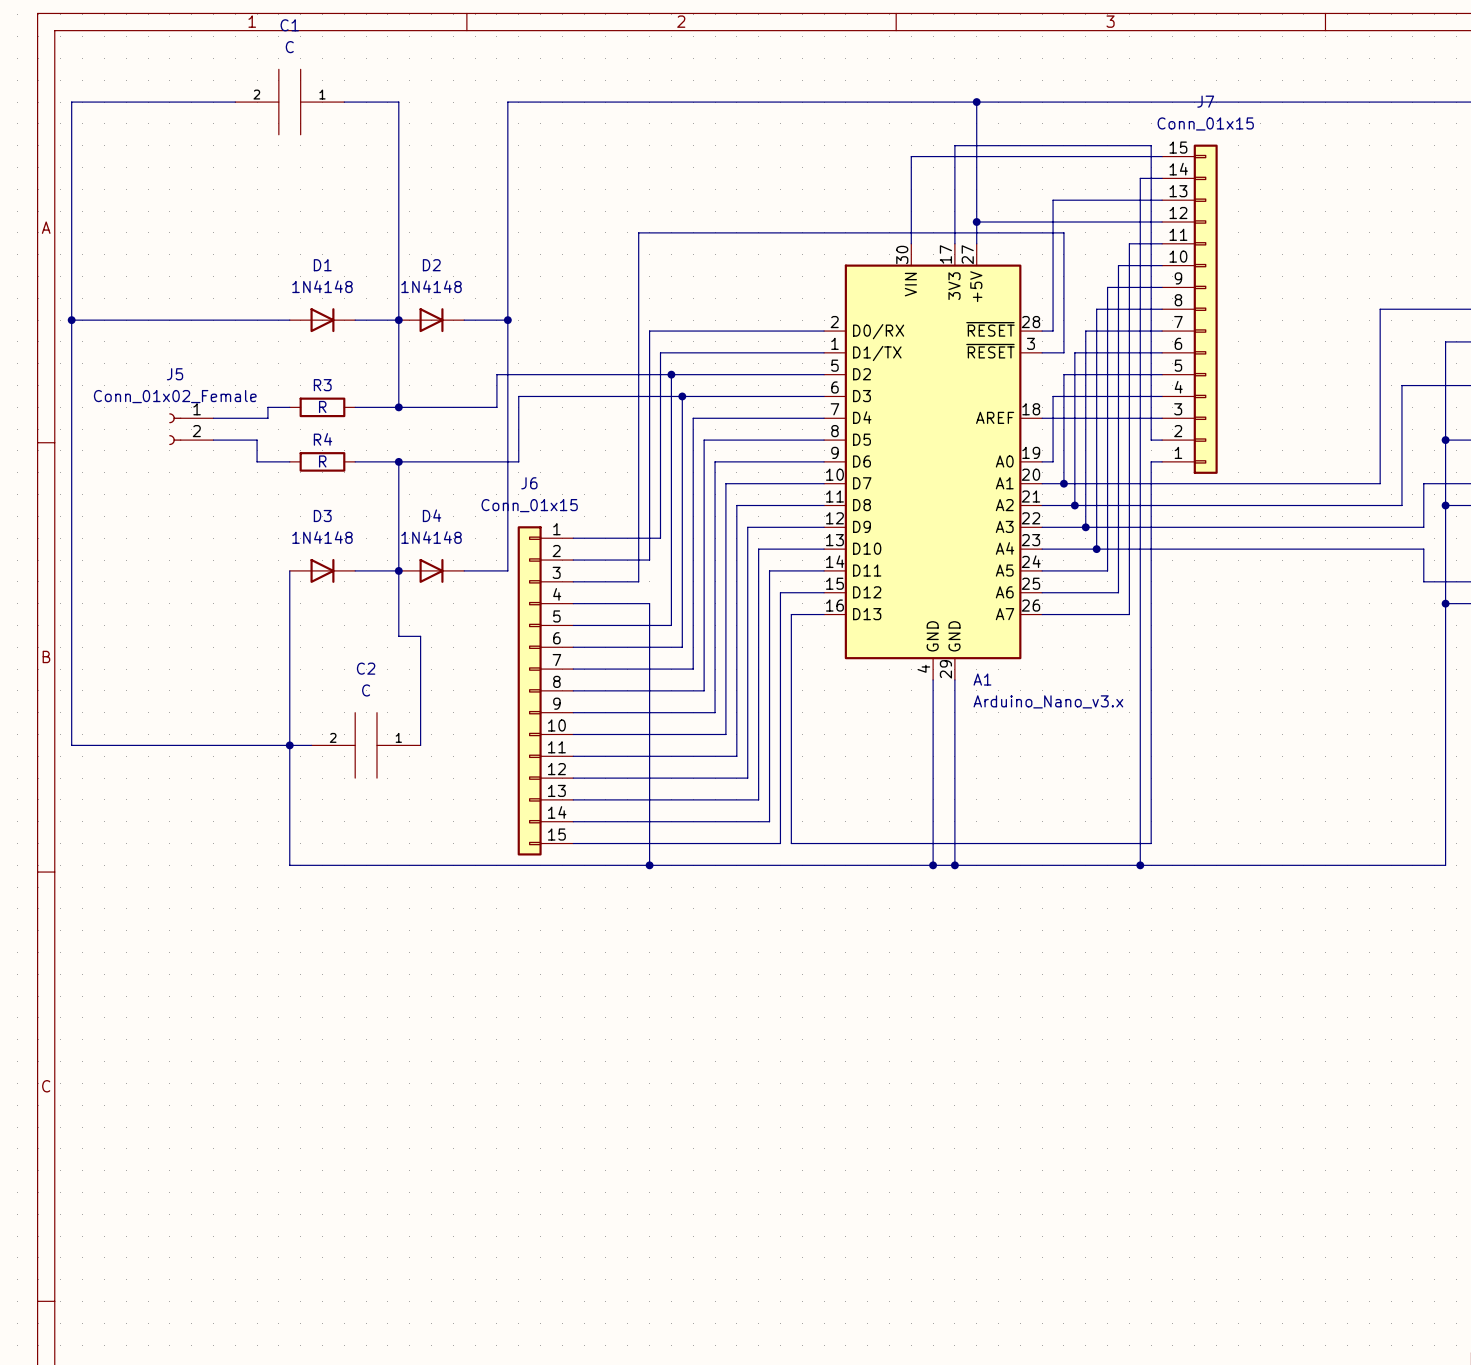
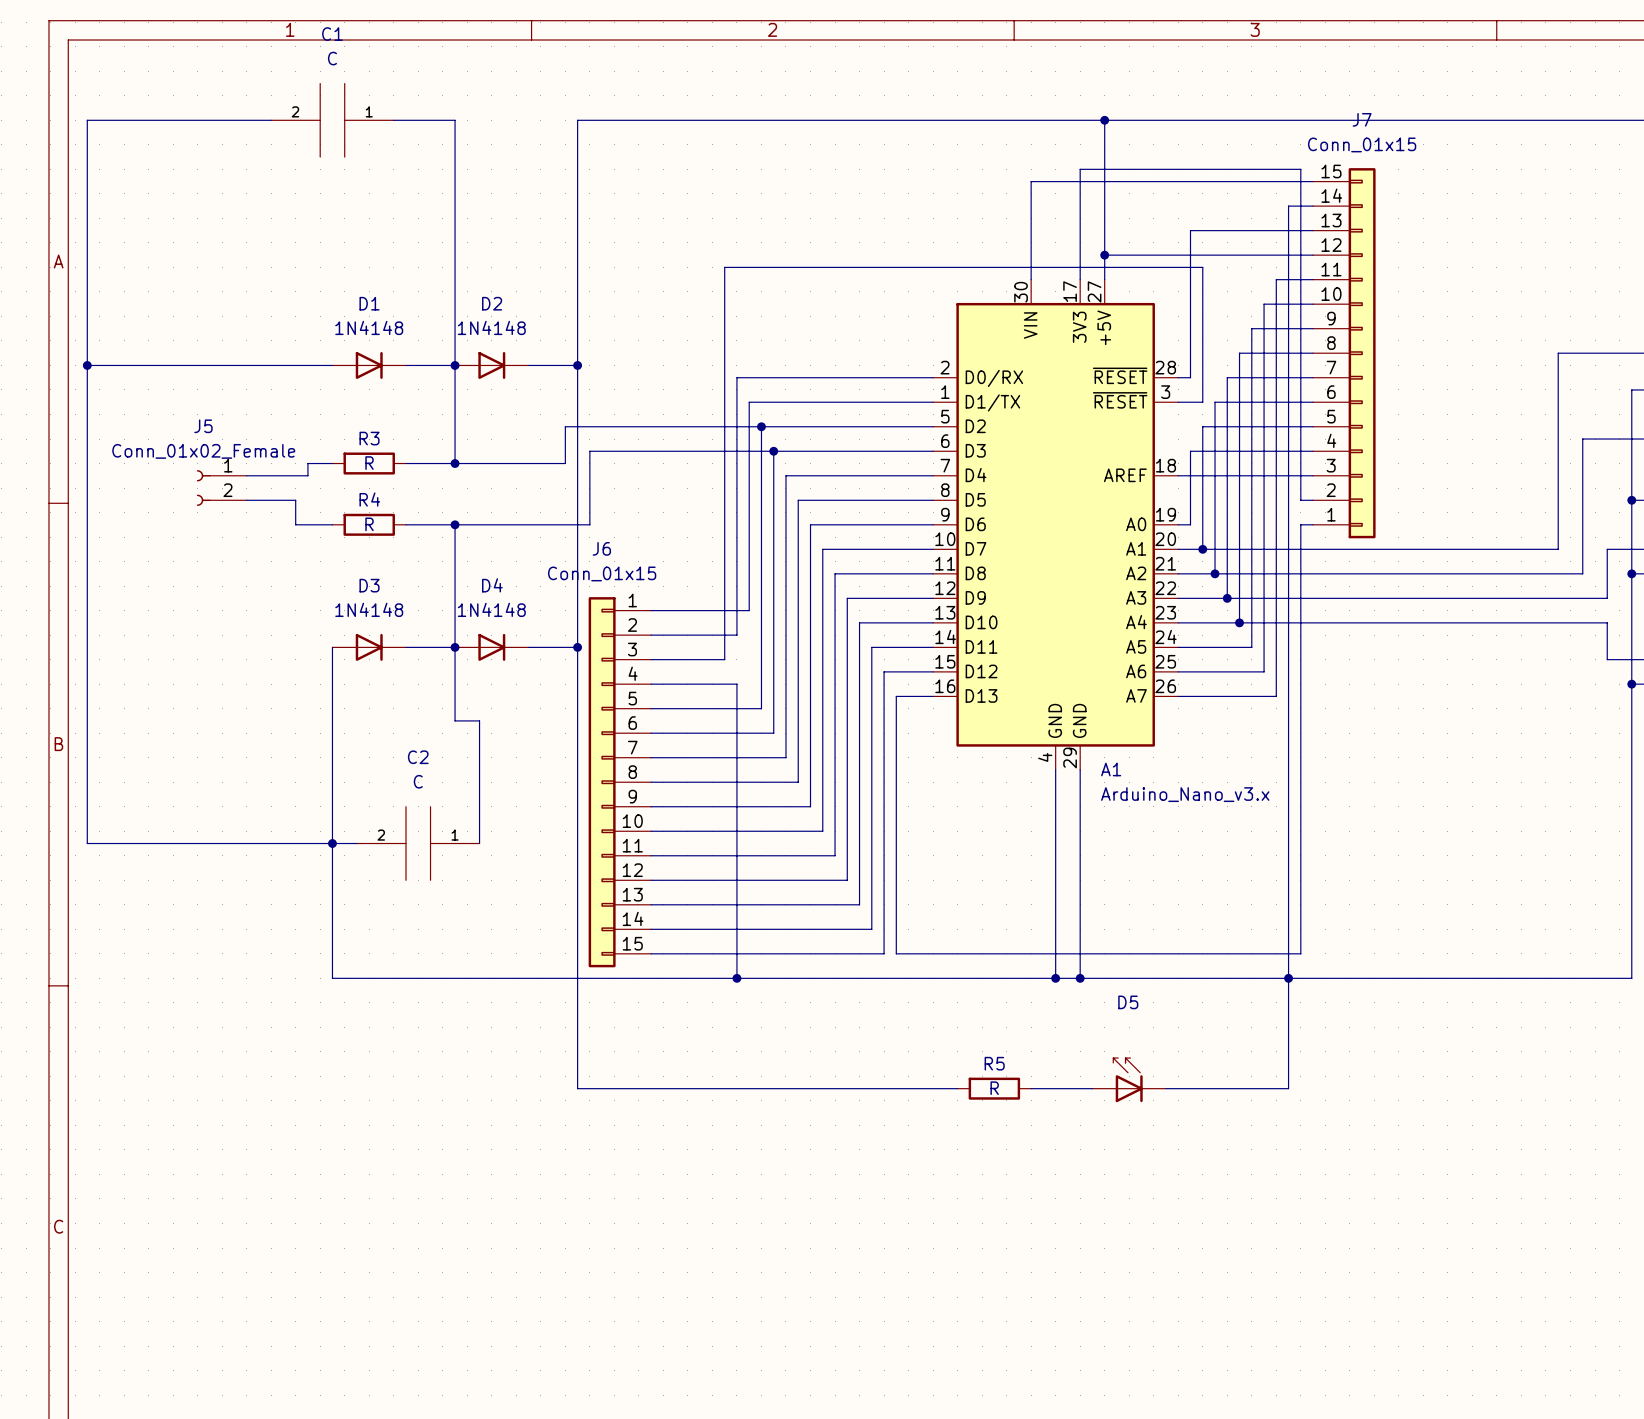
wire: none -> (577, 647) (577, 1088) (957, 1088)
junction: none -> (577, 647)
wire: none -> (1288, 978) (1288, 1088) (1165, 1088)
D5: none -> (1129, 1080)
R5: none -> R (994, 1088)
wire: none -> (1031, 1088) (1092, 1088)

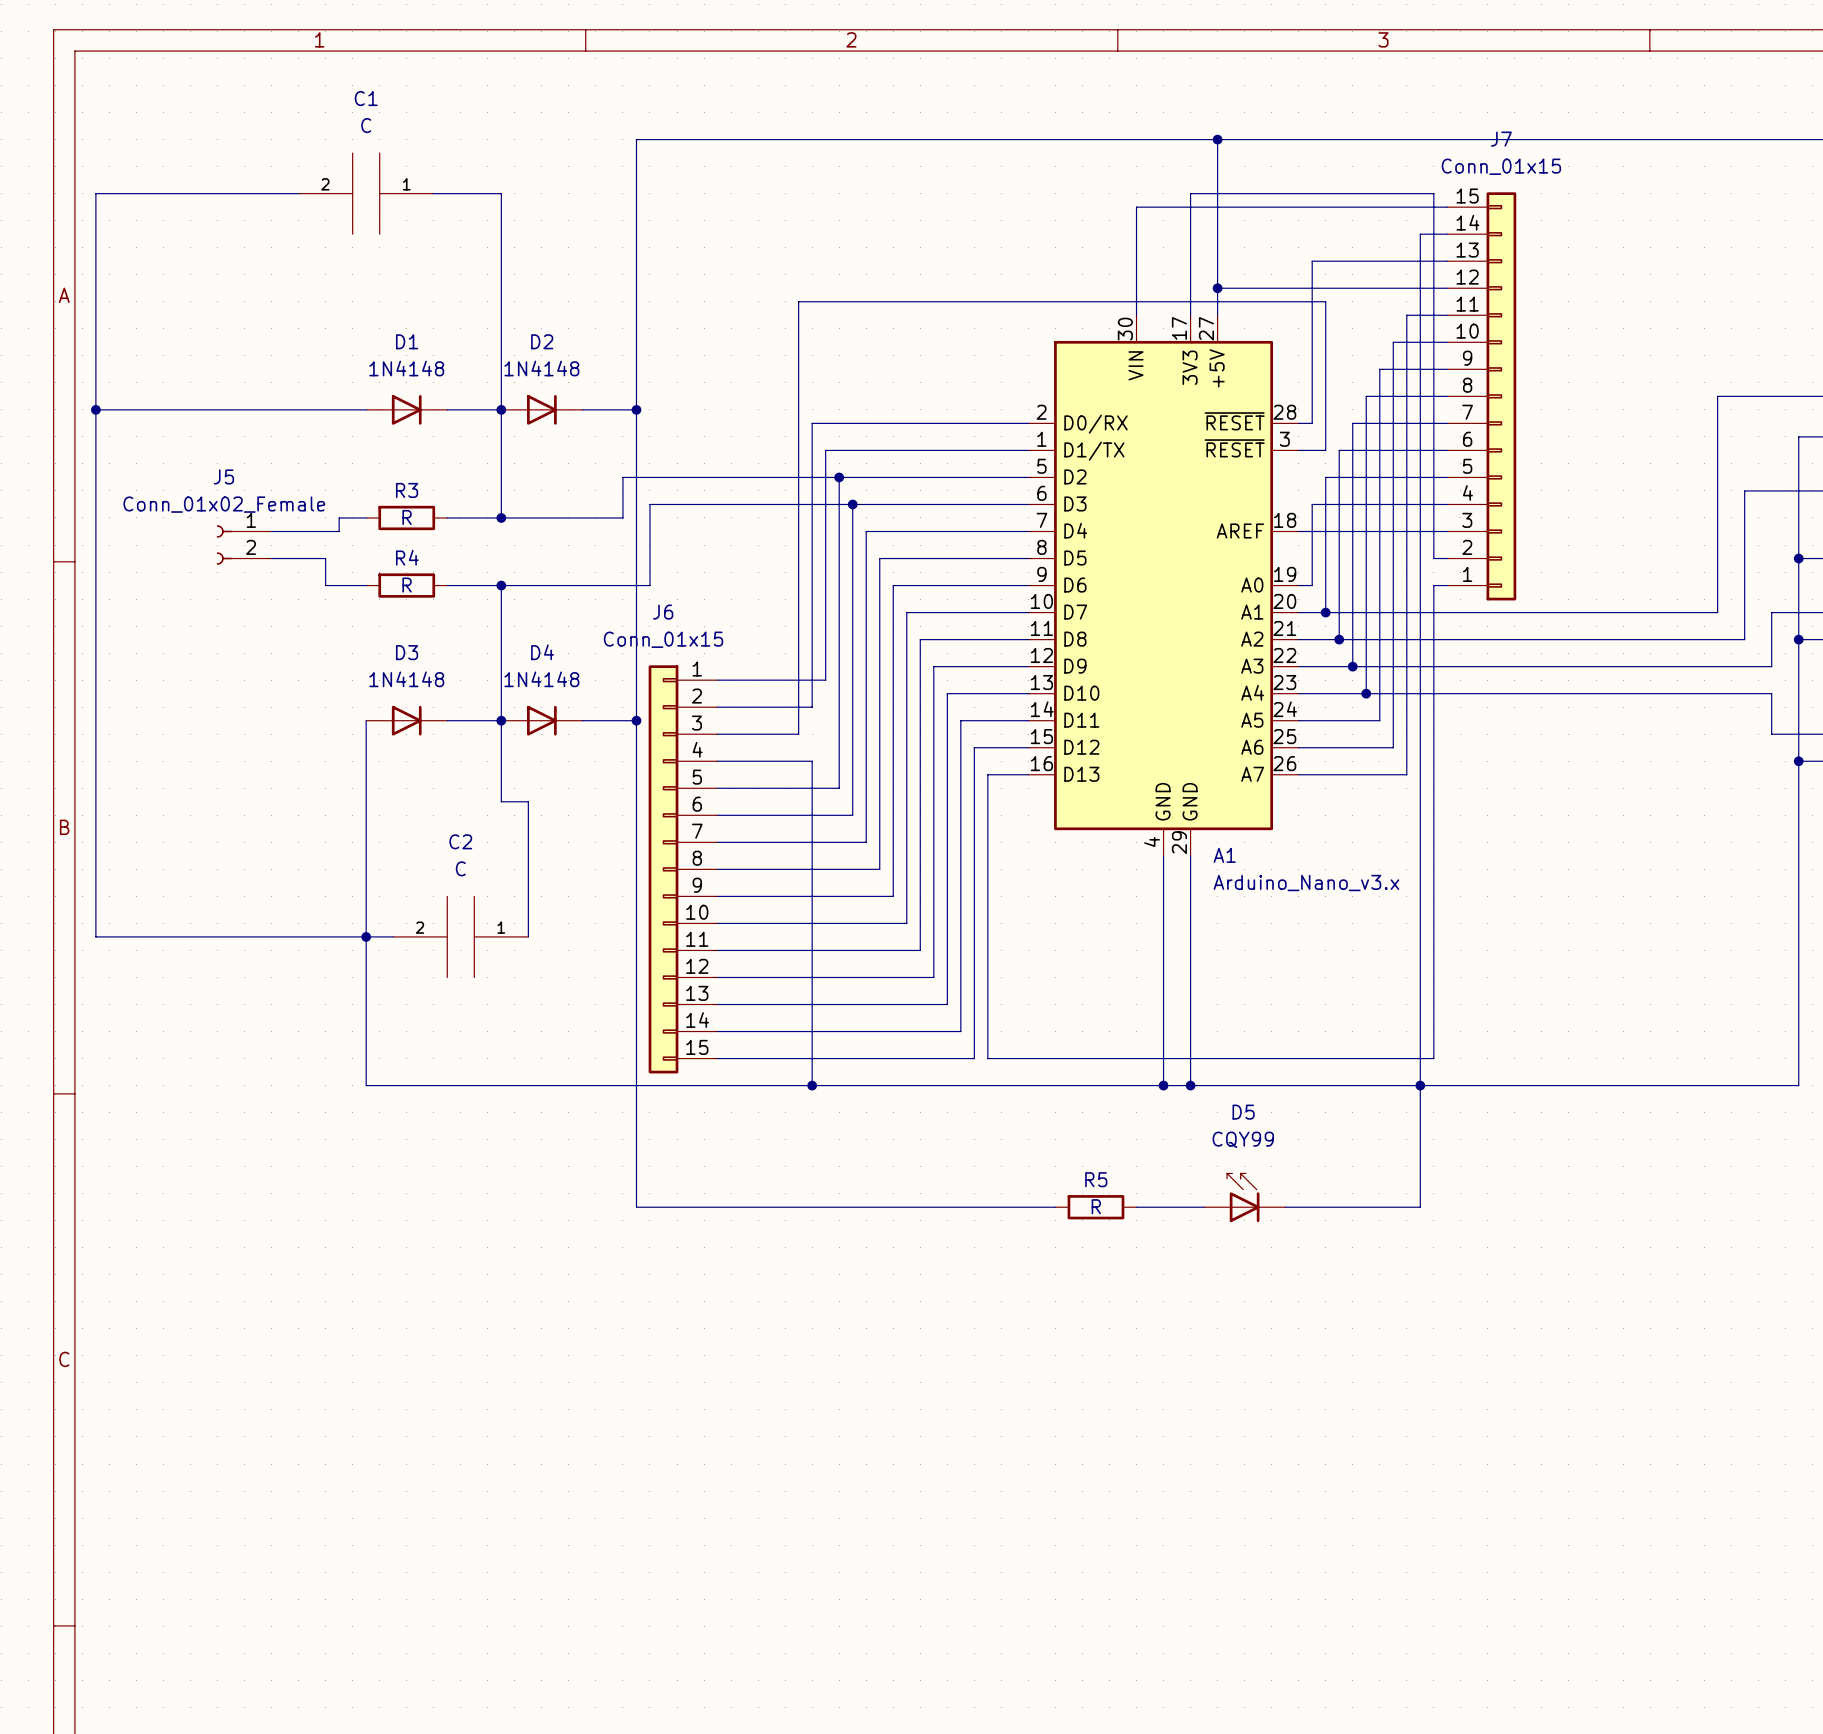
wire: (271, 120) (87, 120) (87, 169) -> (298, 193) (95, 193)
C1 position: (332, 120) -> (366, 193)
wire: (393, 120) (455, 120) (455, 169) -> (433, 193) (501, 193)
D5 value: none -> CQY99 (1243, 1139)

